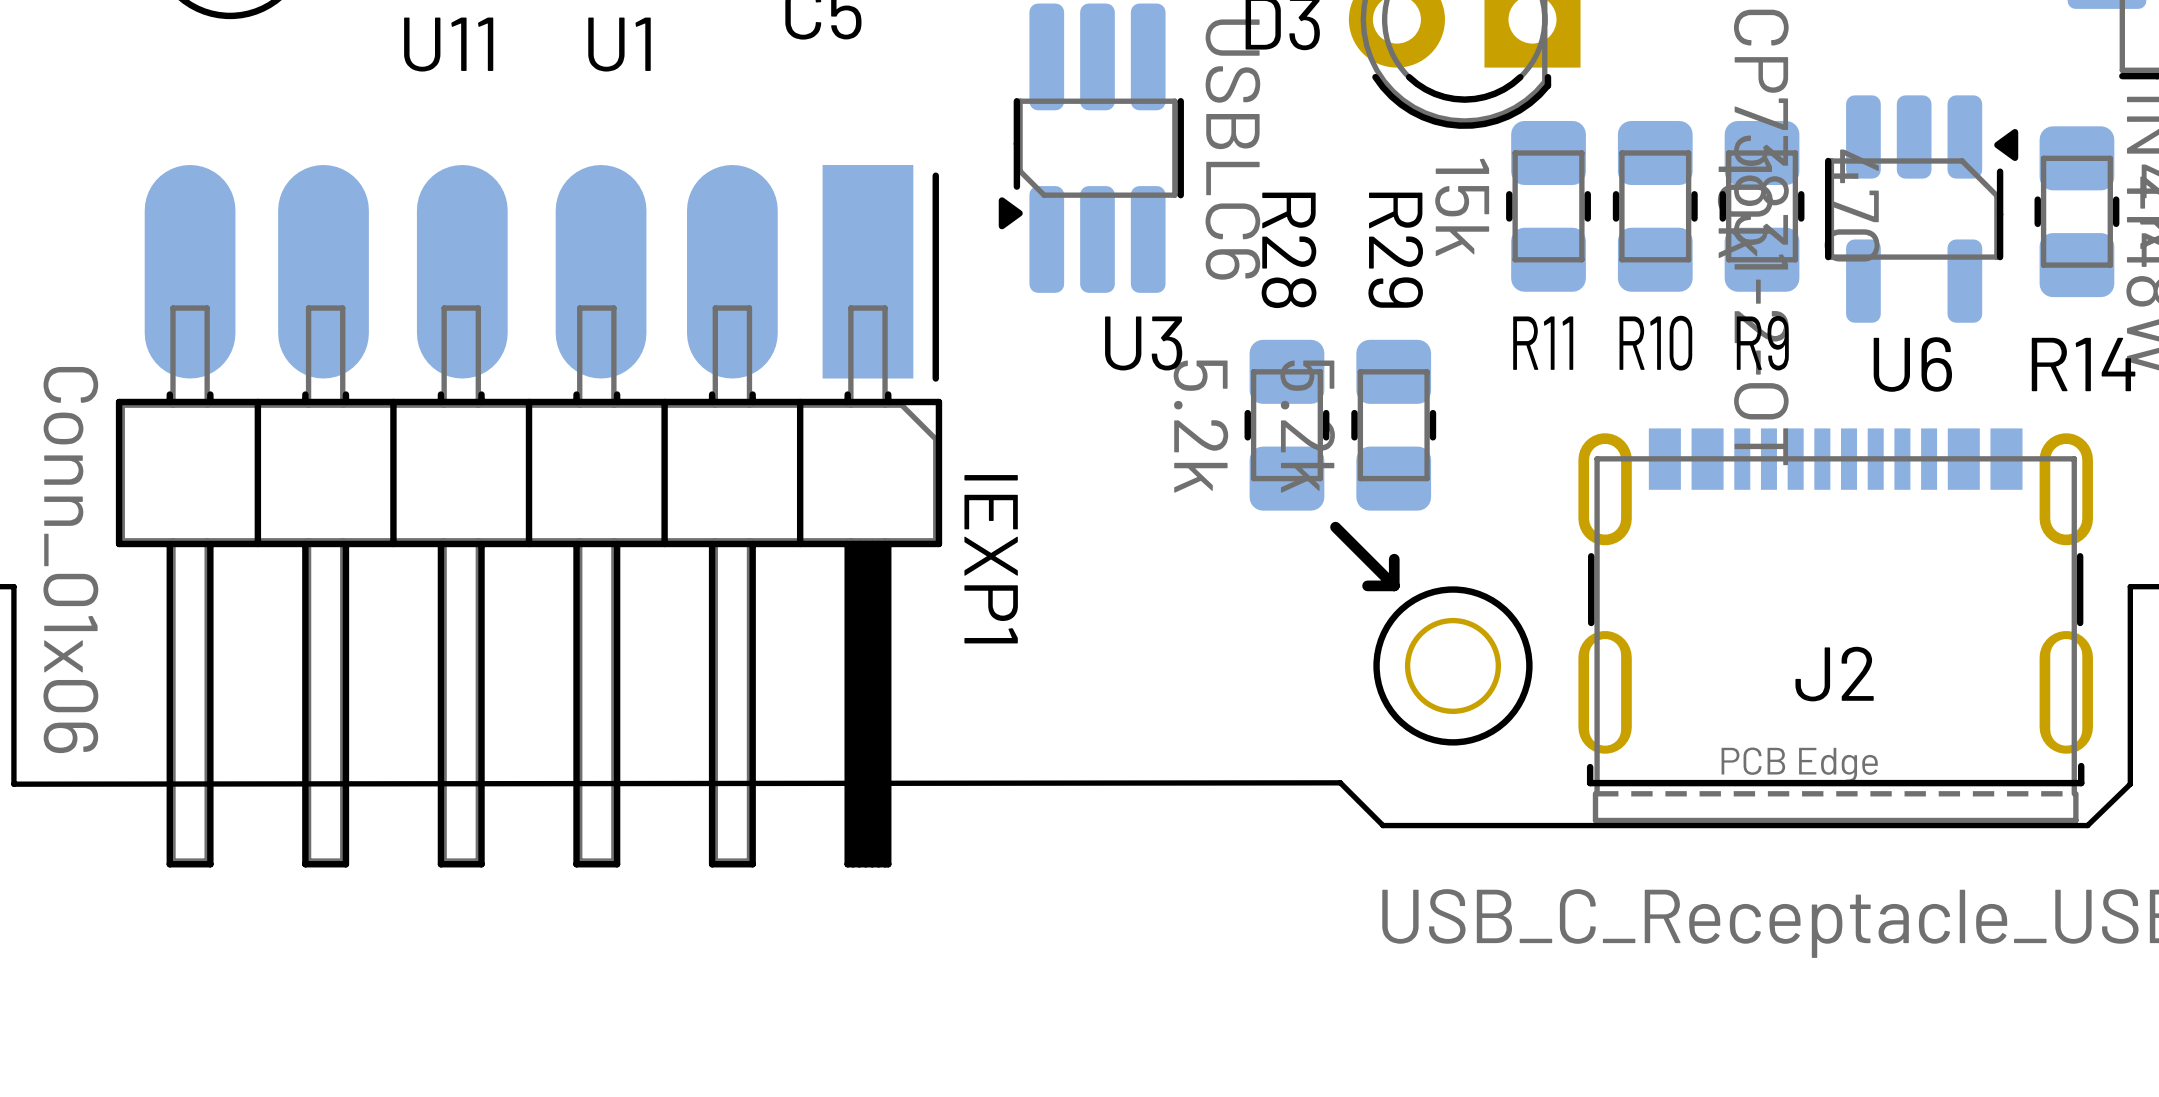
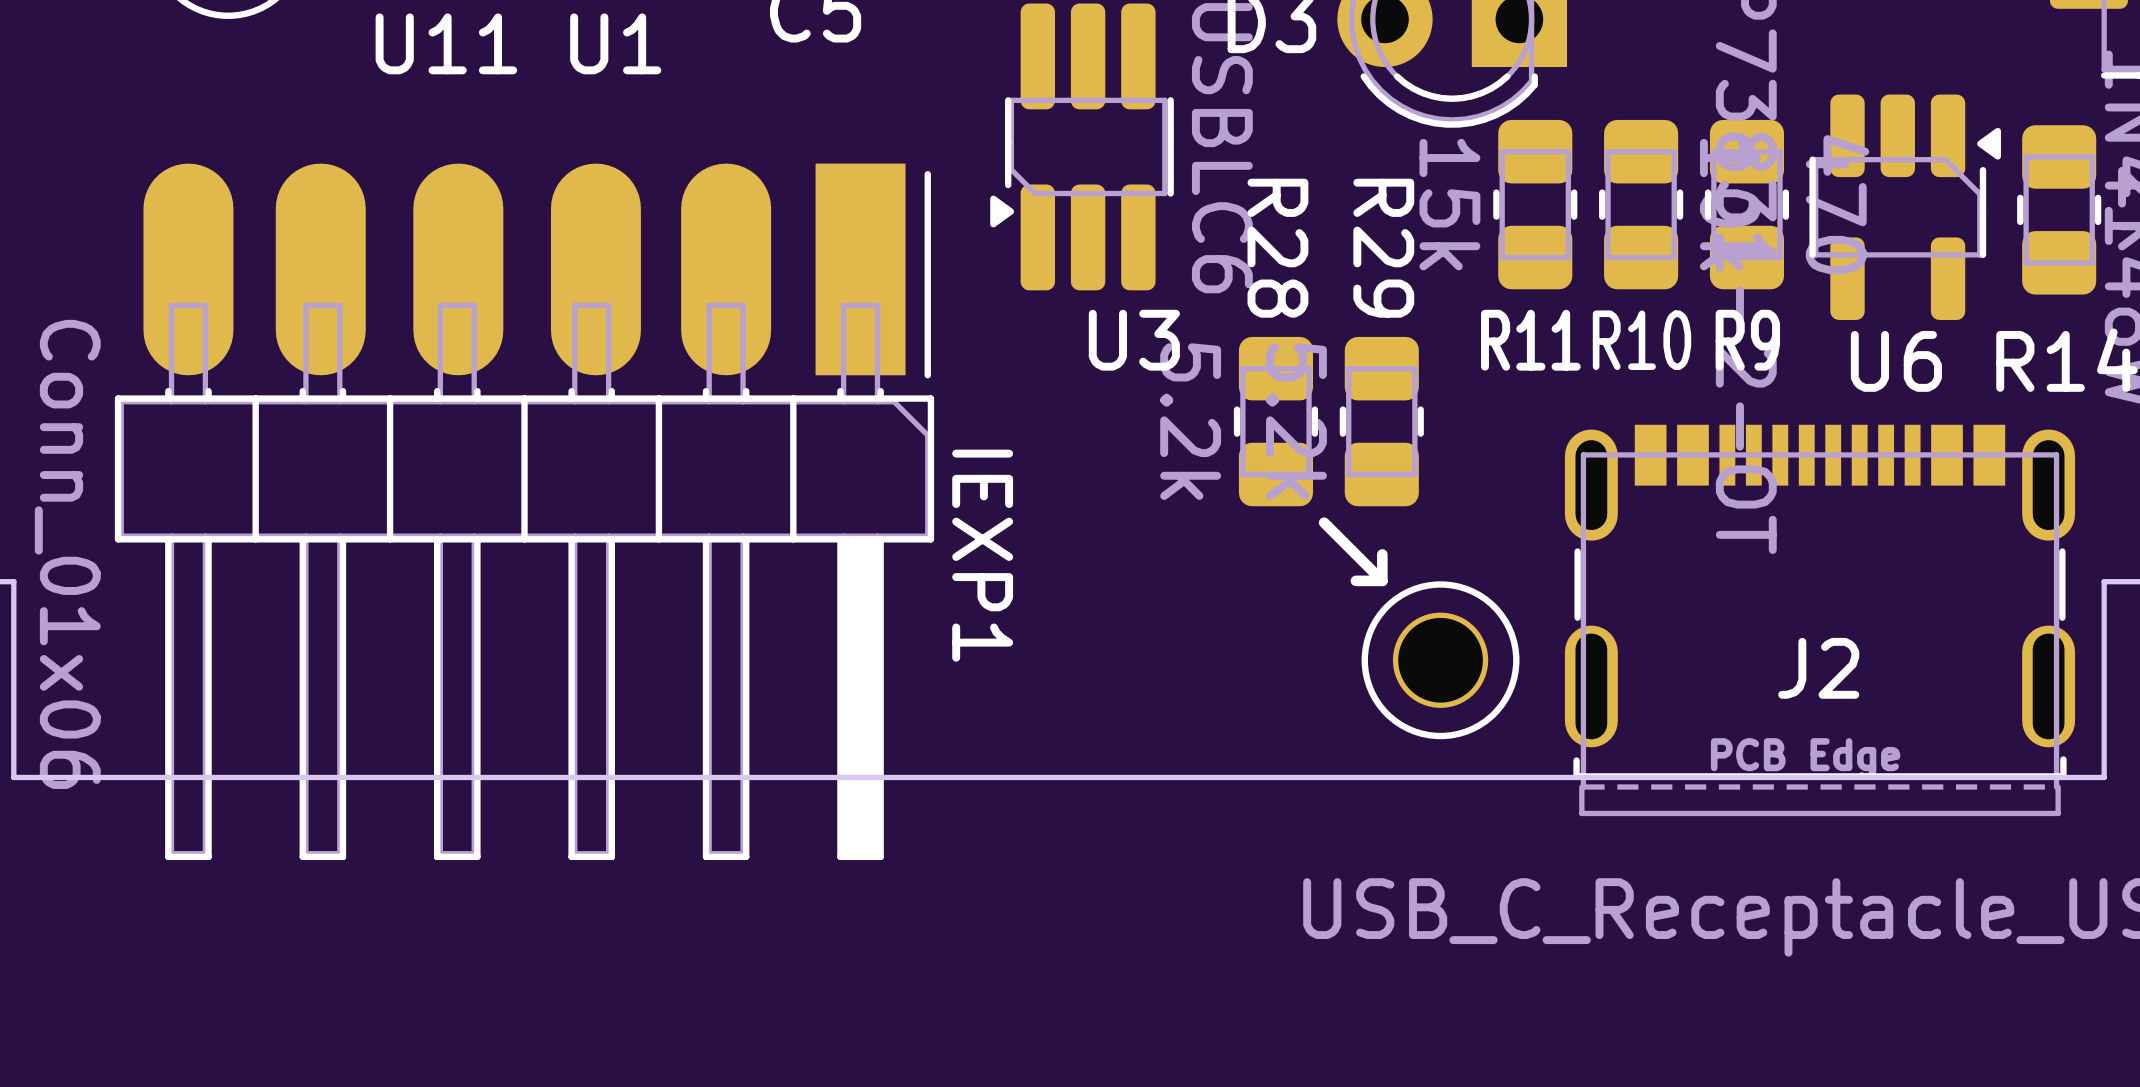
board edge: (2130, 586) (2130, 784) (2087, 825) (1383, 825) (1340, 782) (13, 784) -> (2112, 581) (2104, 581) (2104, 777) (13, 777)

